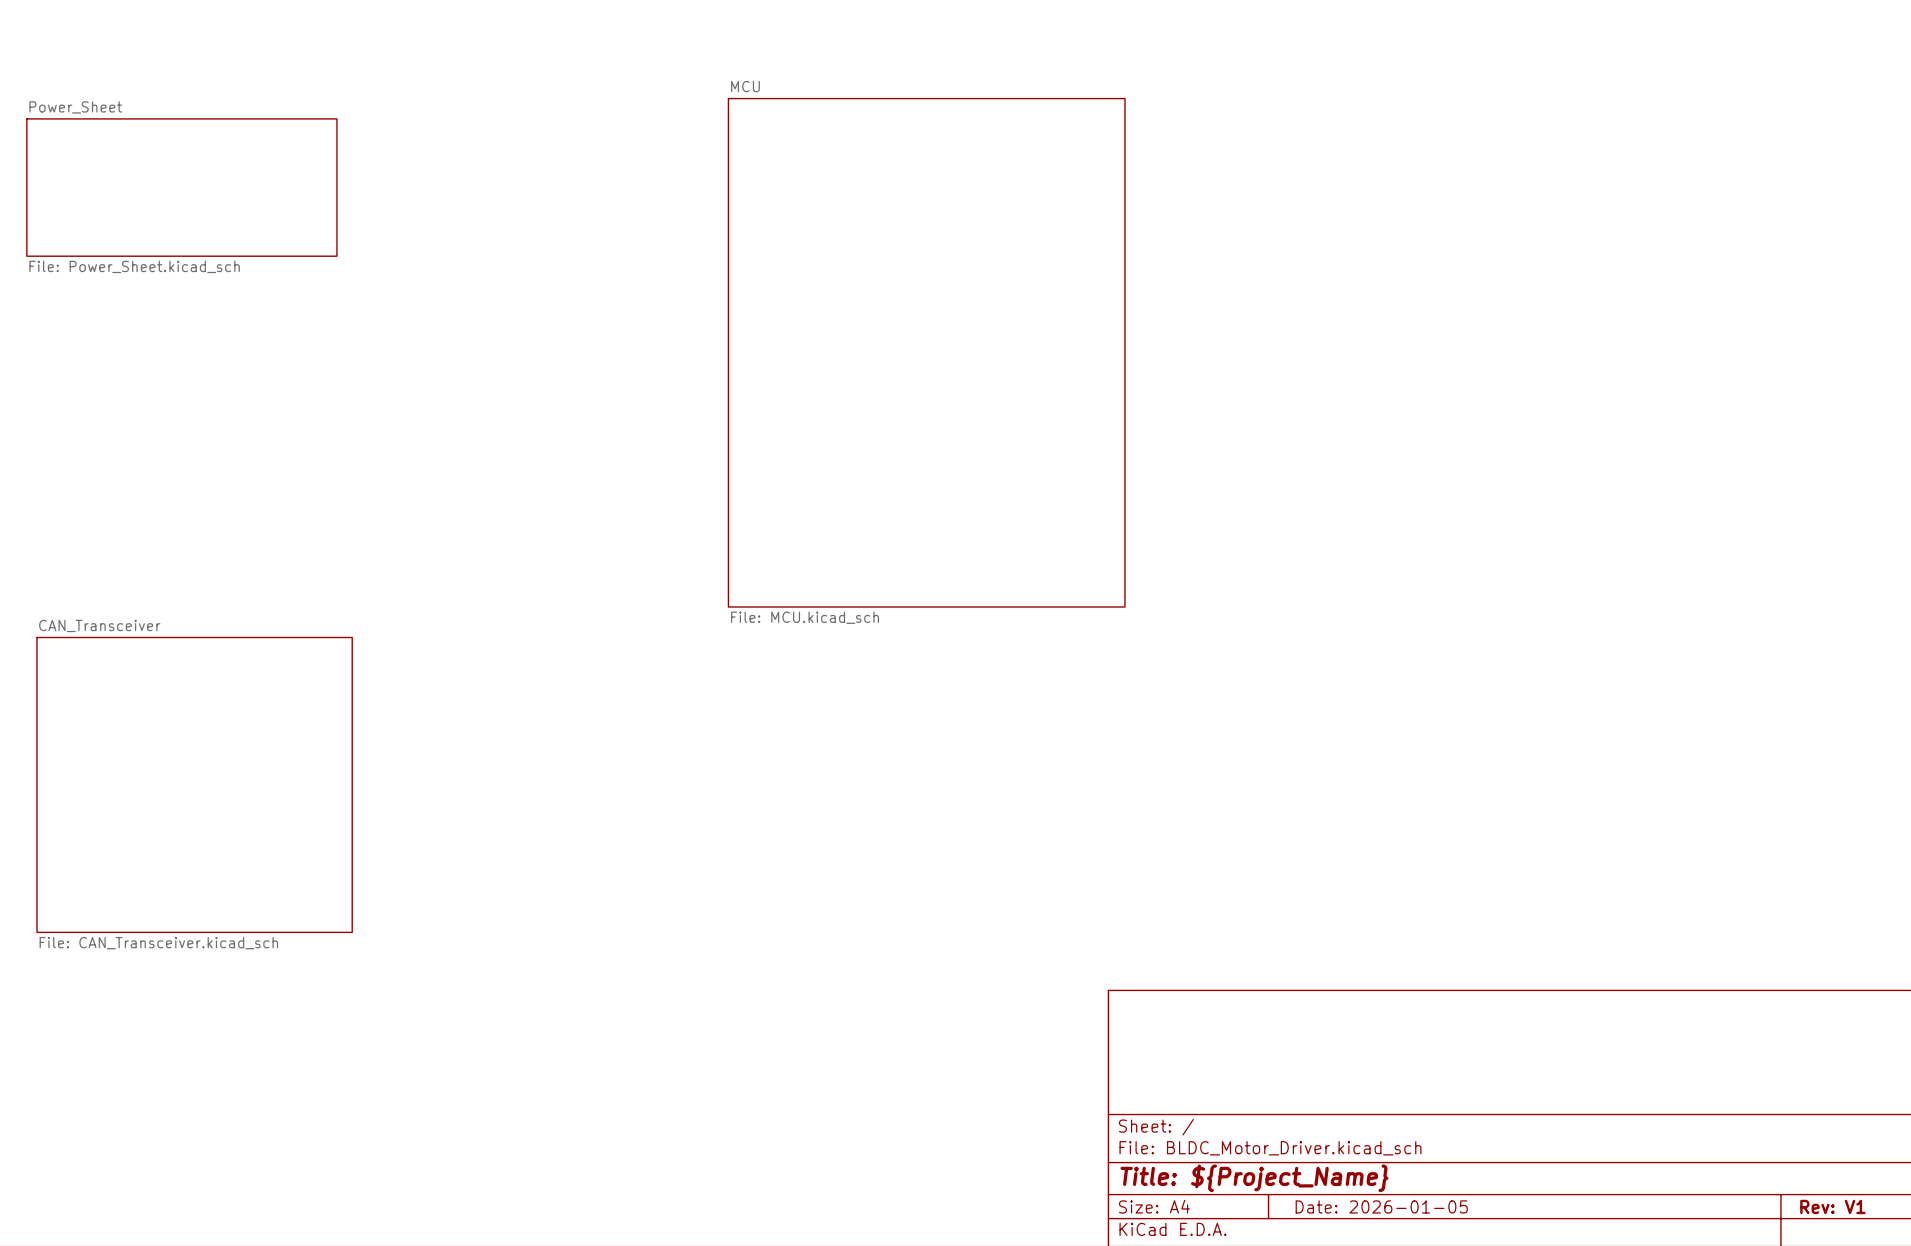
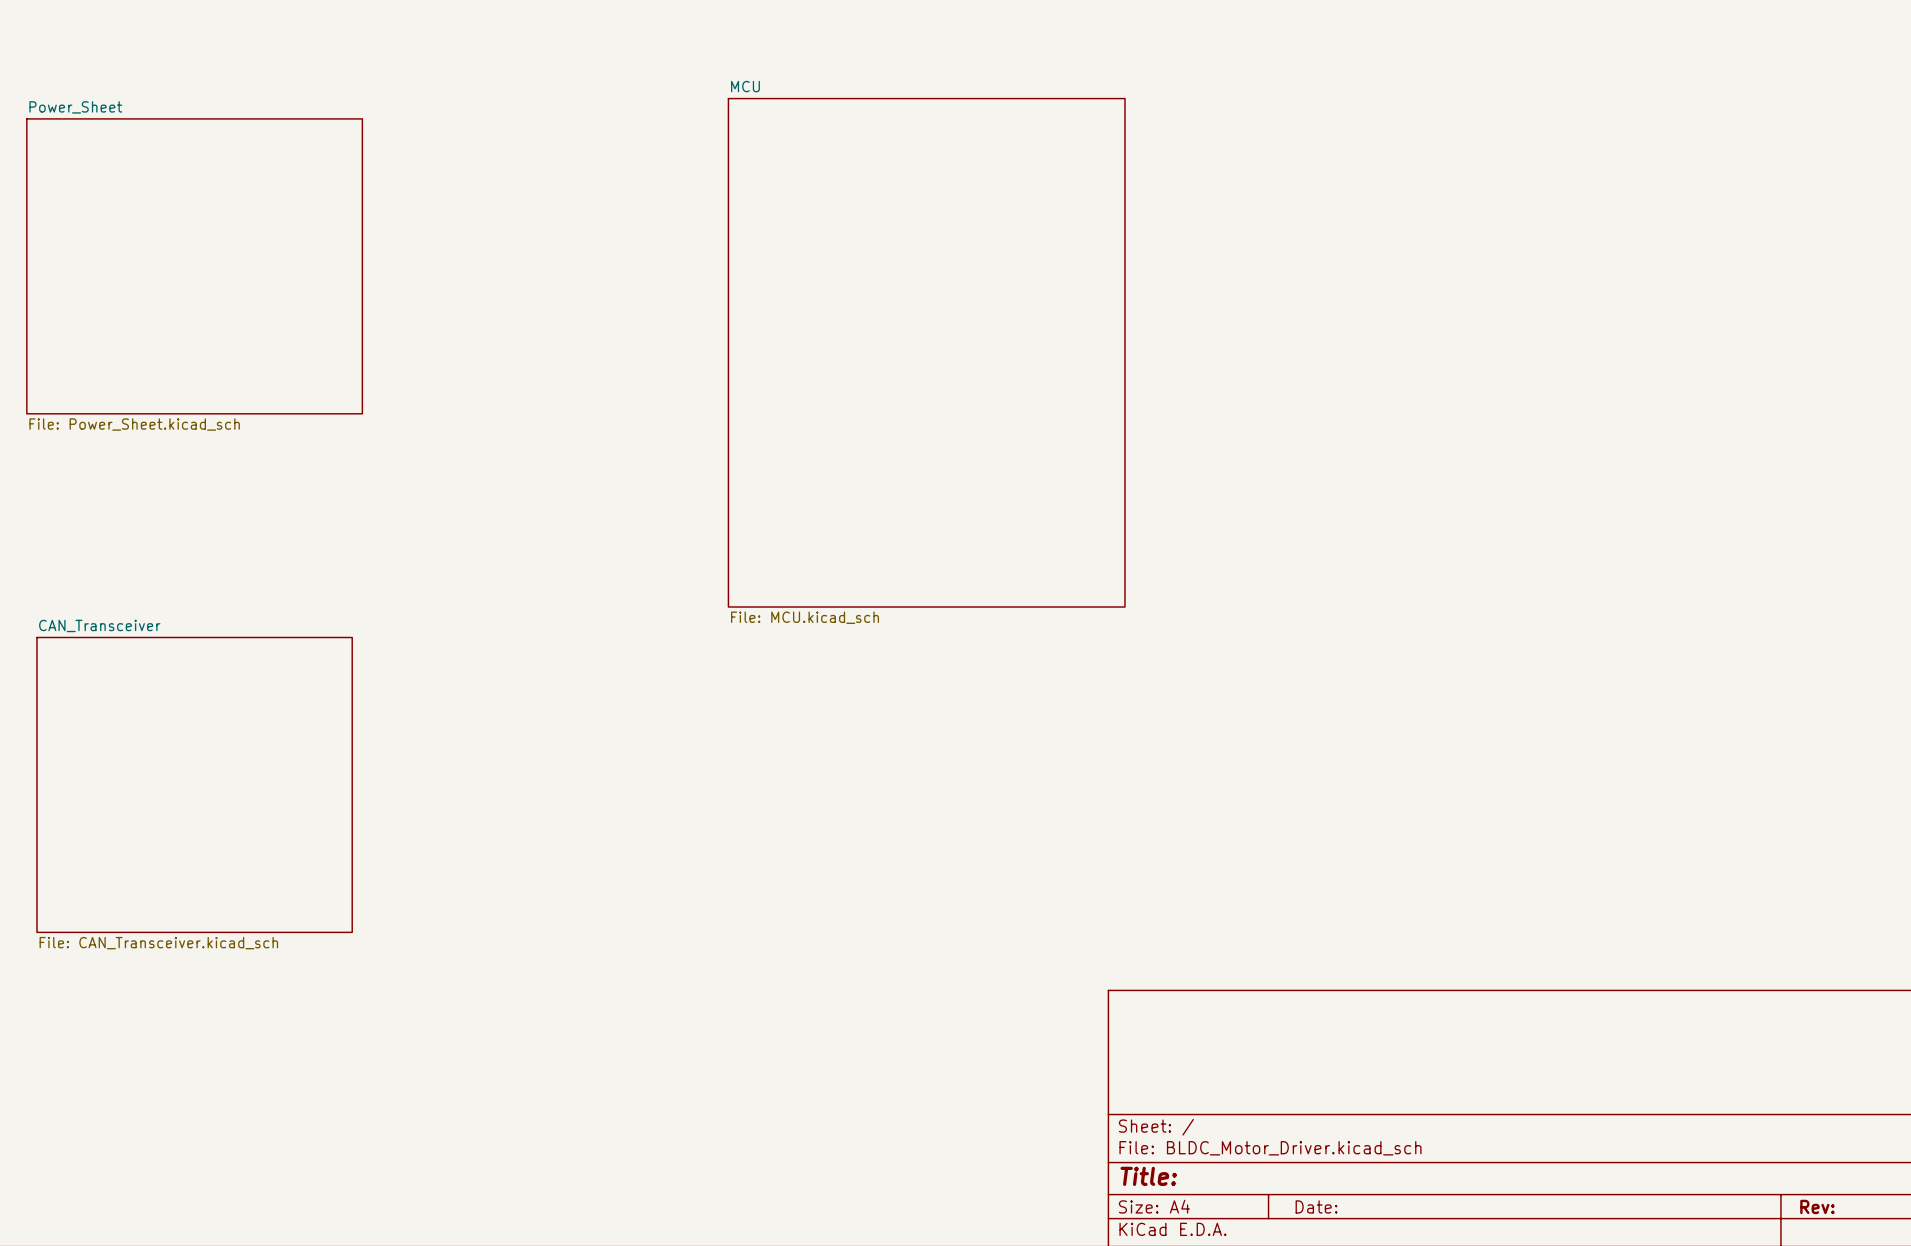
sheet Power_Sheet: File: Power_Sheet.kicad_sch (181, 187) -> none
sheet Power_Sheet: none -> File: Power_Sheet.kicad_sch (194, 266)
title block: Title: ${Project_Name} (1254, 1178) -> Title: (1148, 1176)
title block: Date: 2026-01-05 (1381, 1206) -> Date: (1316, 1206)
title block: Rev: V1 (1832, 1206) -> Rev: (1817, 1206)

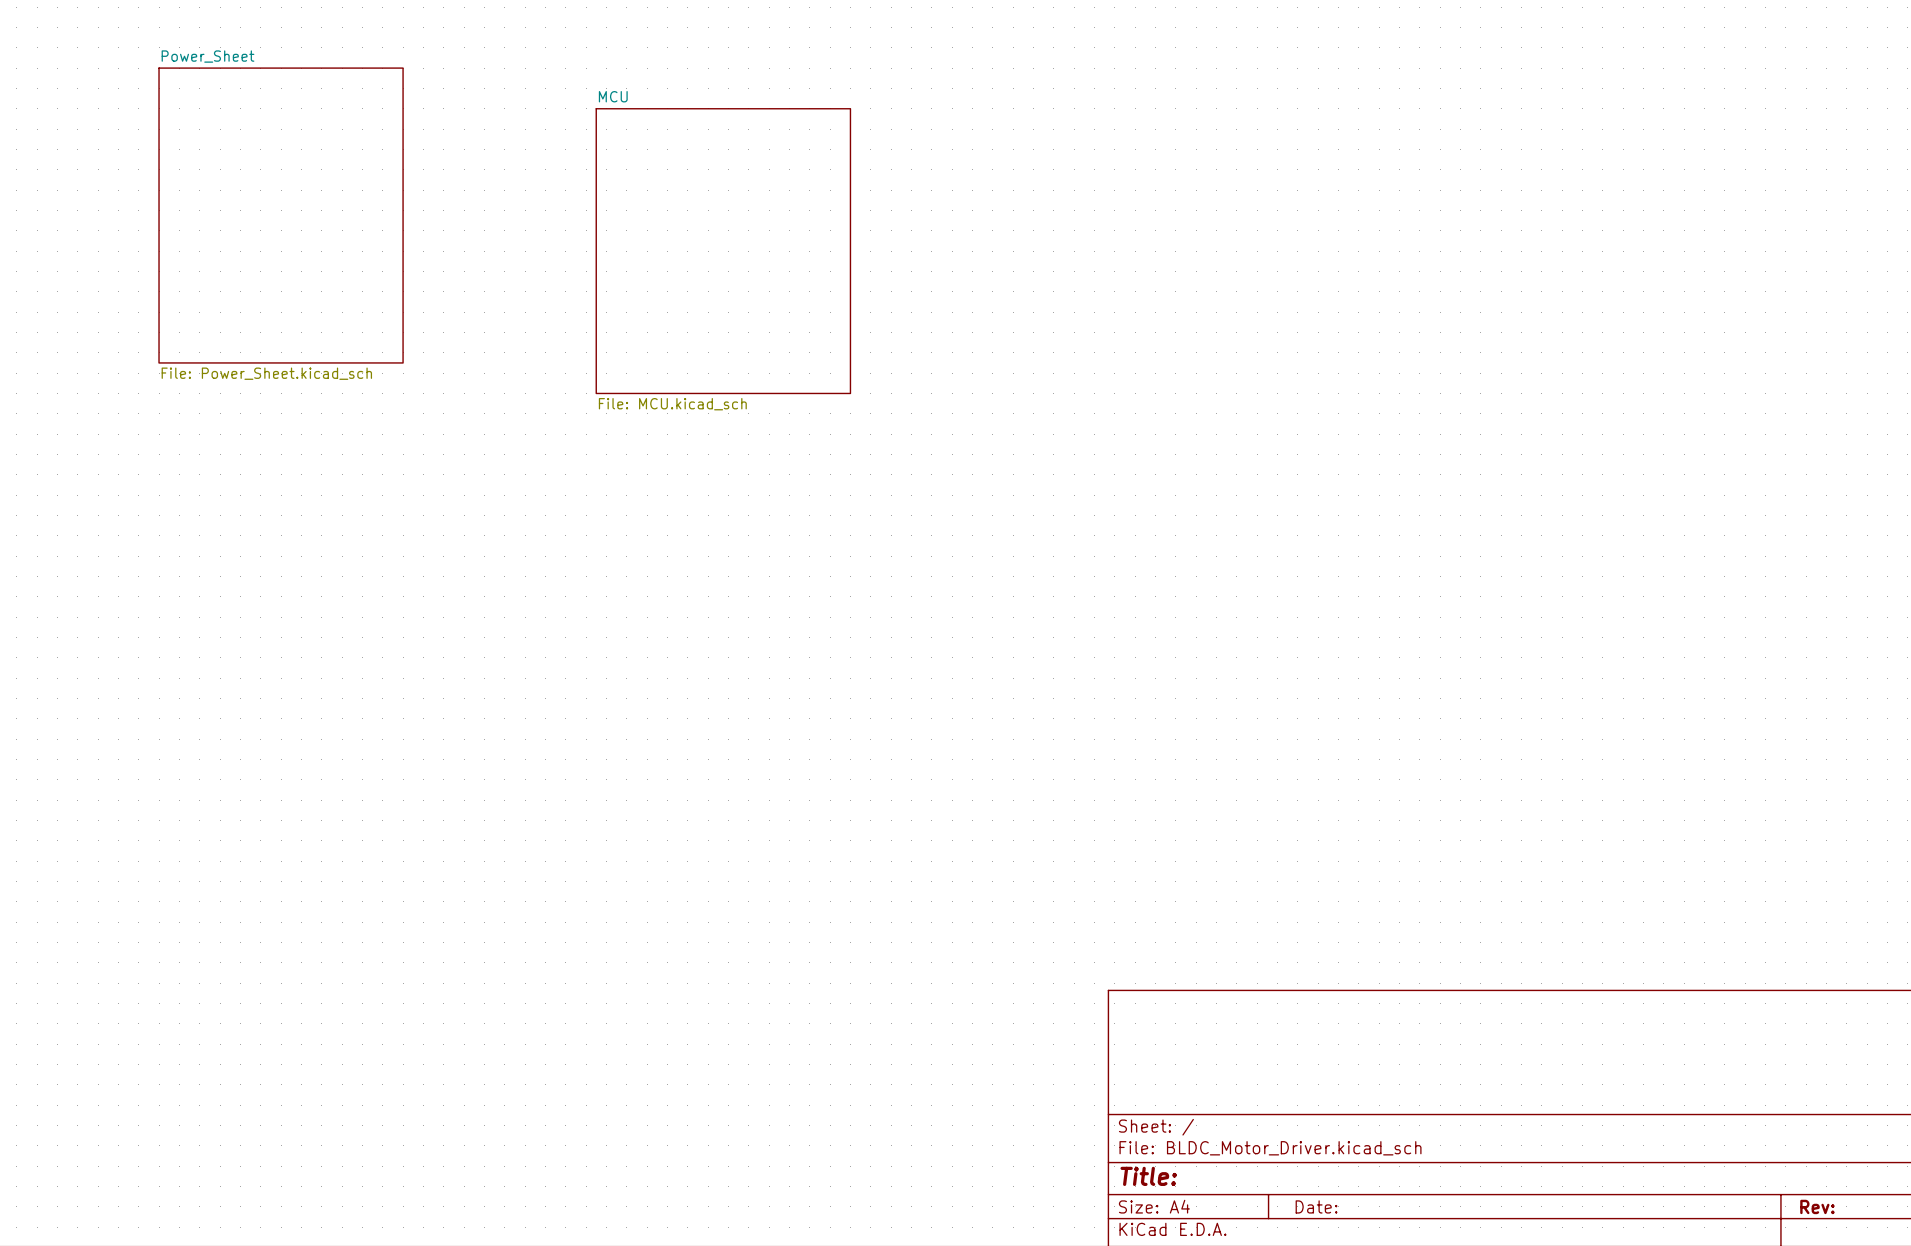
sheet Power_Sheet: none -> File: Power_Sheet.kicad_sch (281, 215)
sheet MCU: none -> File: MCU.kicad_sch (723, 251)
sheet Power_Sheet: File: Power_Sheet.kicad_sch (194, 266) -> none
sheet MCU: File: MCU.kicad_sch (926, 352) -> none
sheet CAN_Transceiver: File: CAN_Transceiver.kicad_sch (194, 784) -> none

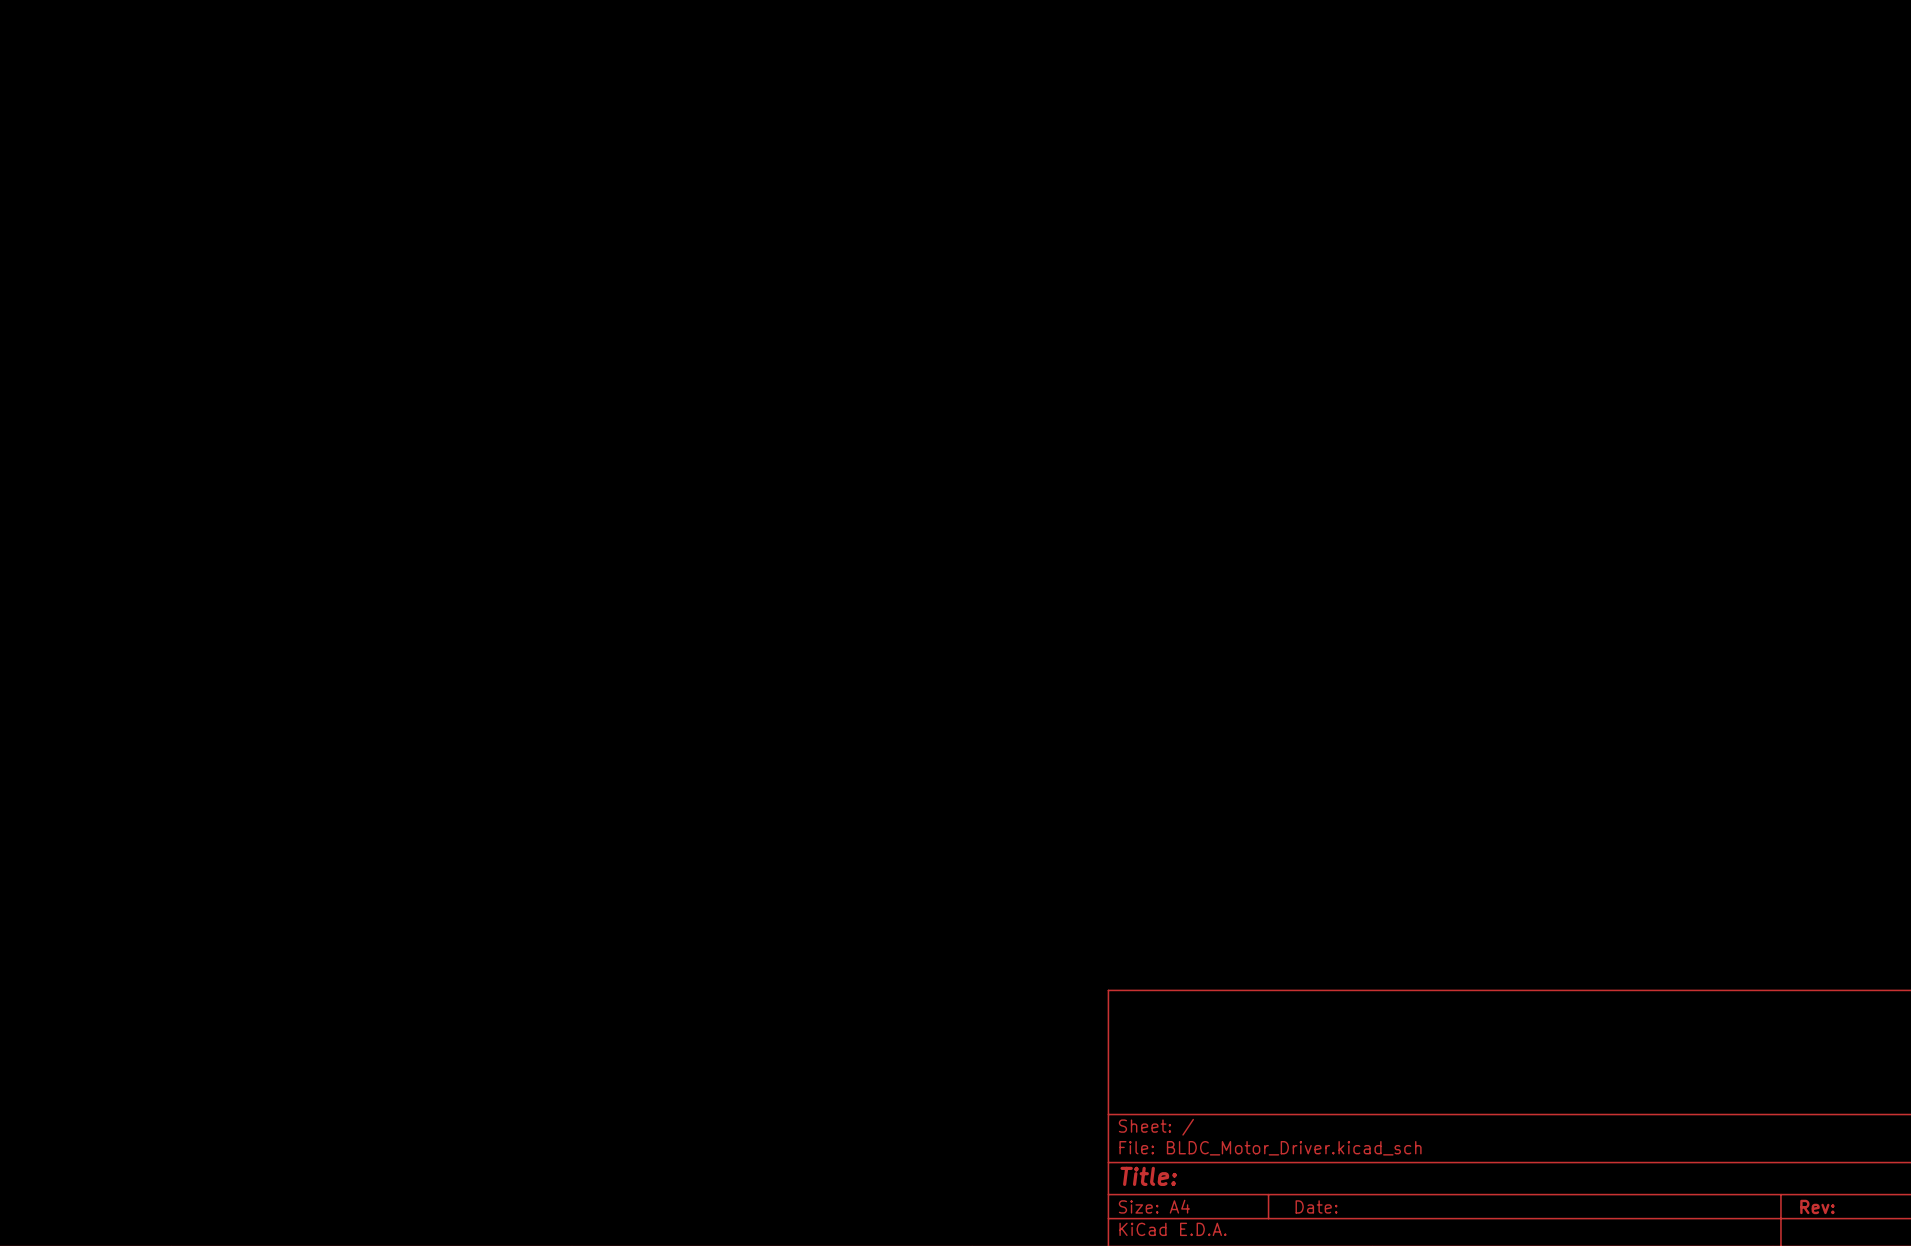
sheet Power_Sheet: File: Power_Sheet.kicad_sch (281, 215) -> none
sheet MCU: File: MCU.kicad_sch (723, 251) -> none

